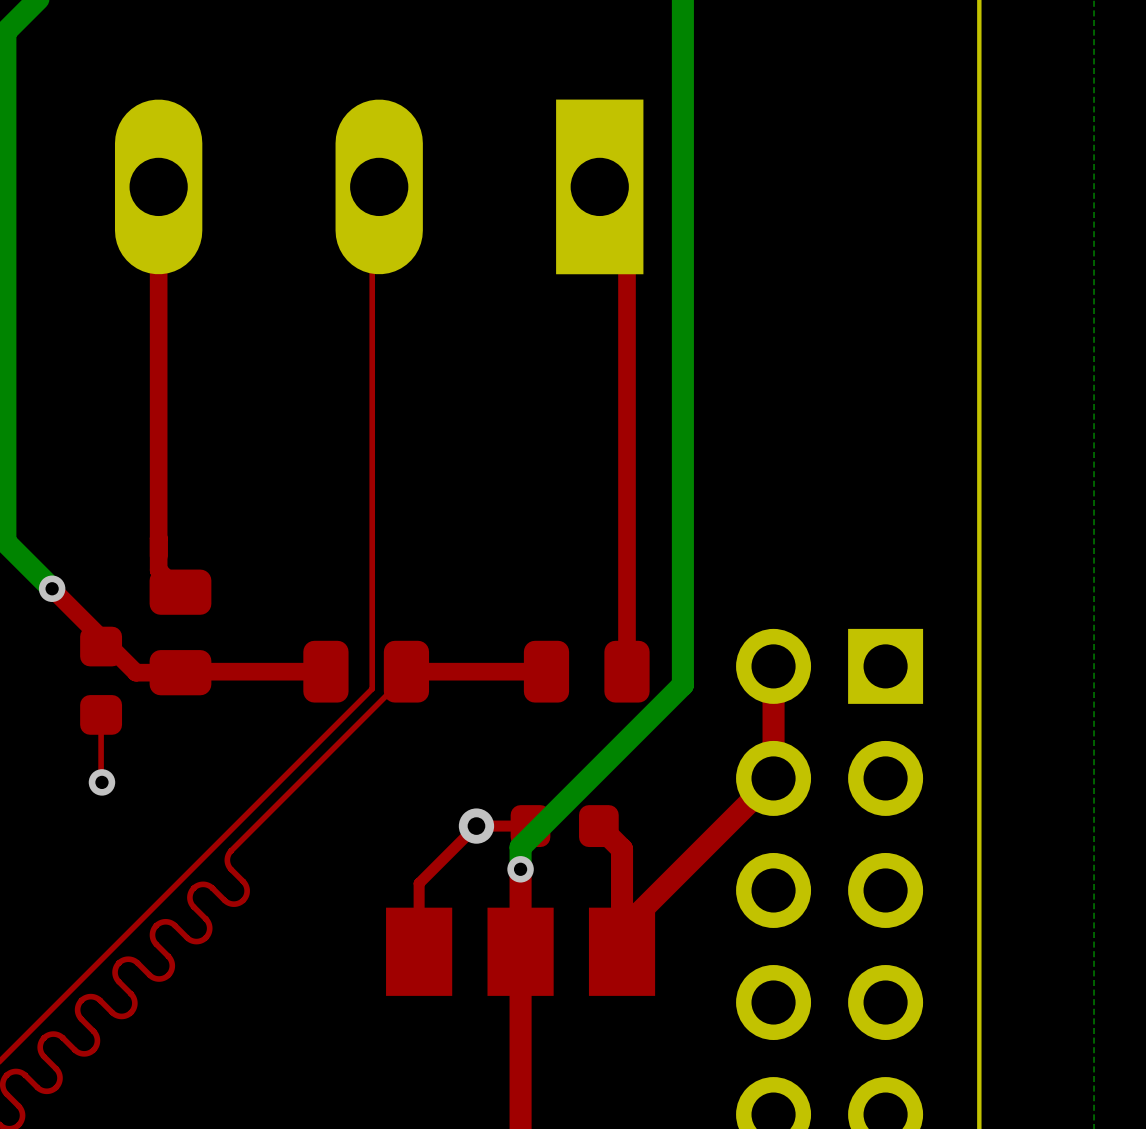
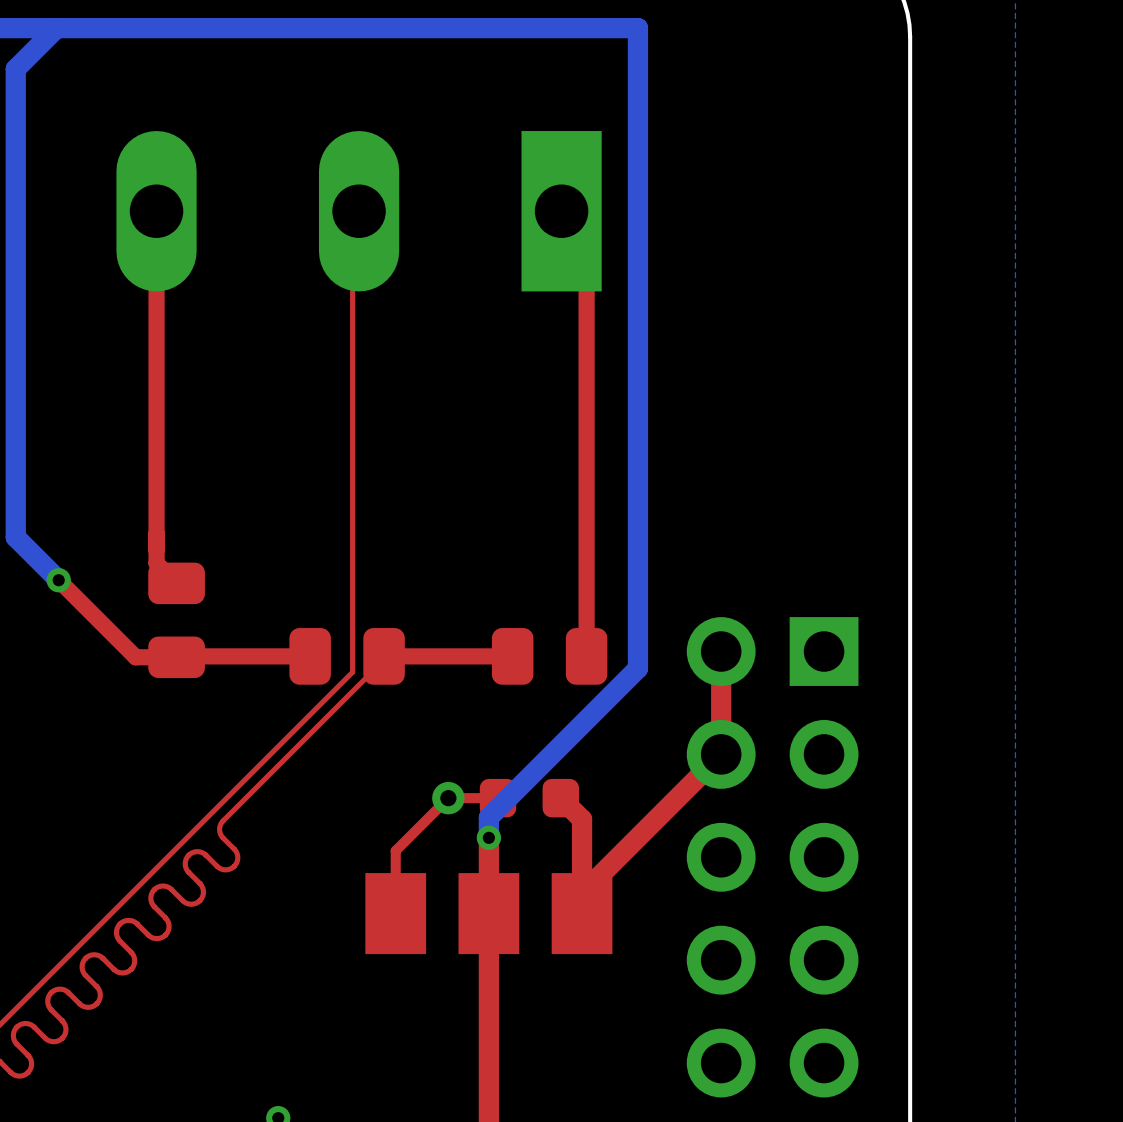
part: (101, 680) -> none
top track: (101, 714) (101, 782) -> none
via: (101, 782) -> none

